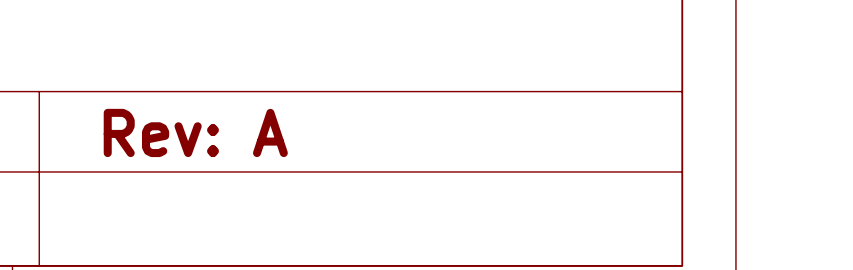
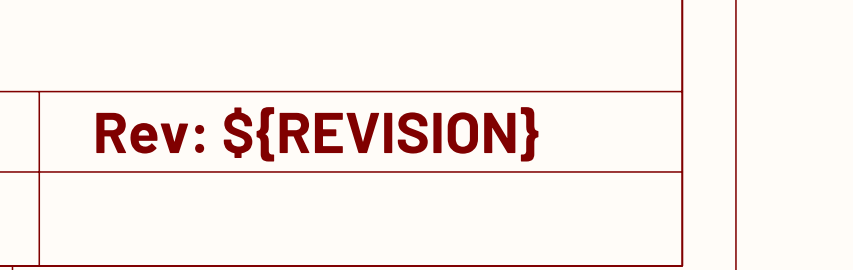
title block: Rev: A (195, 132) -> Rev: ${REVISION} (317, 134)

